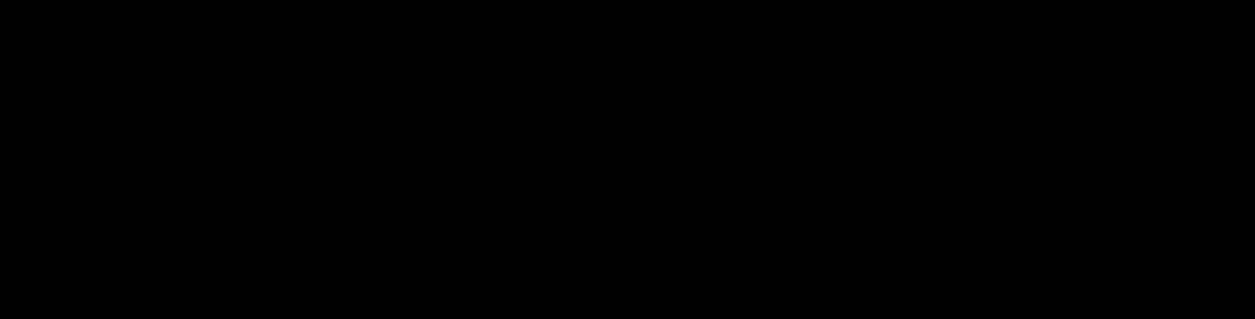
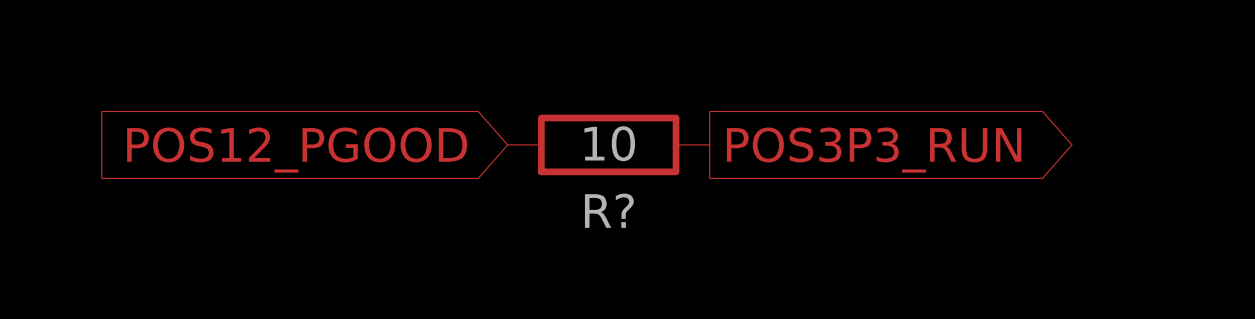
R?: none -> 10 (608, 144)
global label: none -> POS12_PGOOD (297, 150)
global label: none -> POS3P3_RUN (874, 150)

